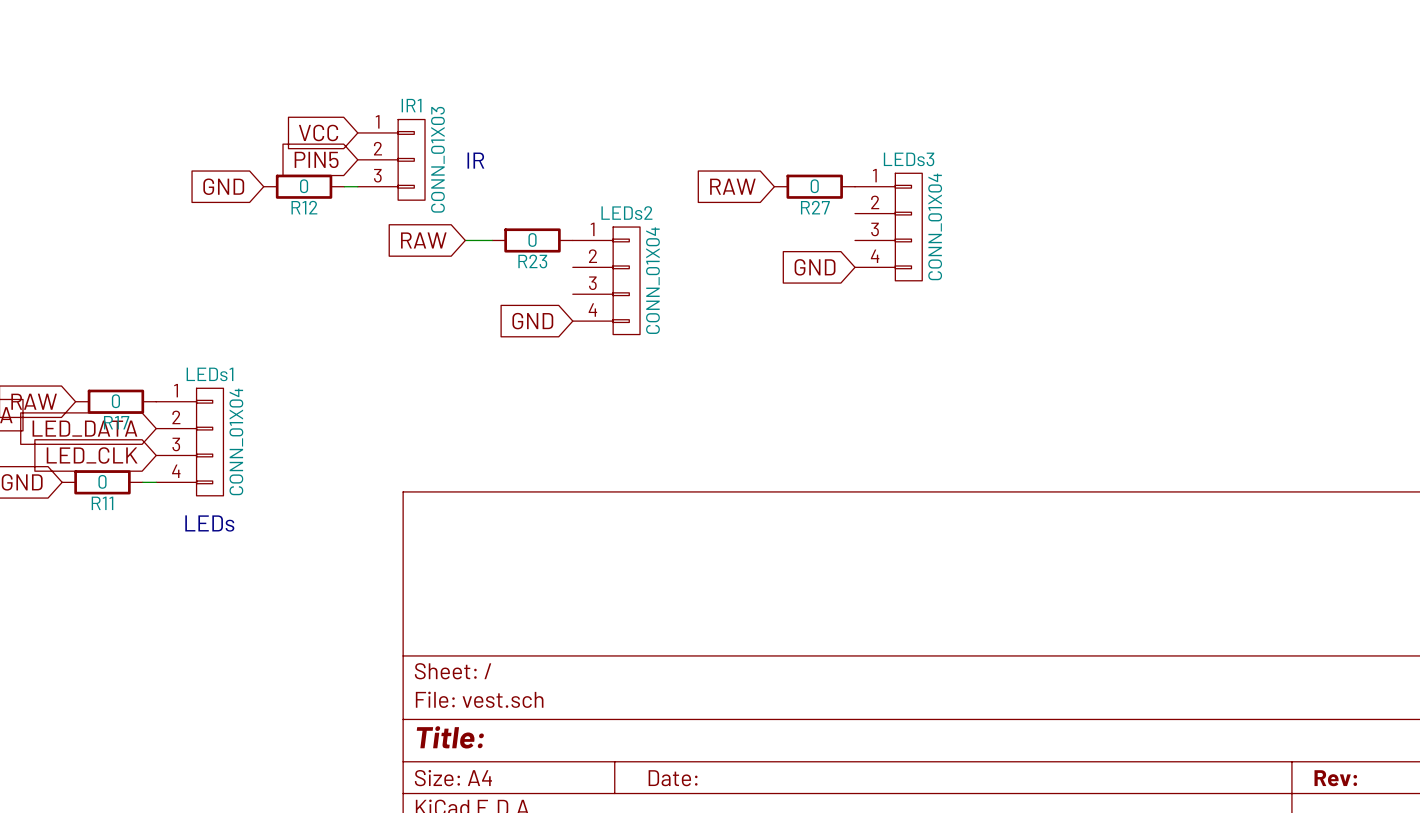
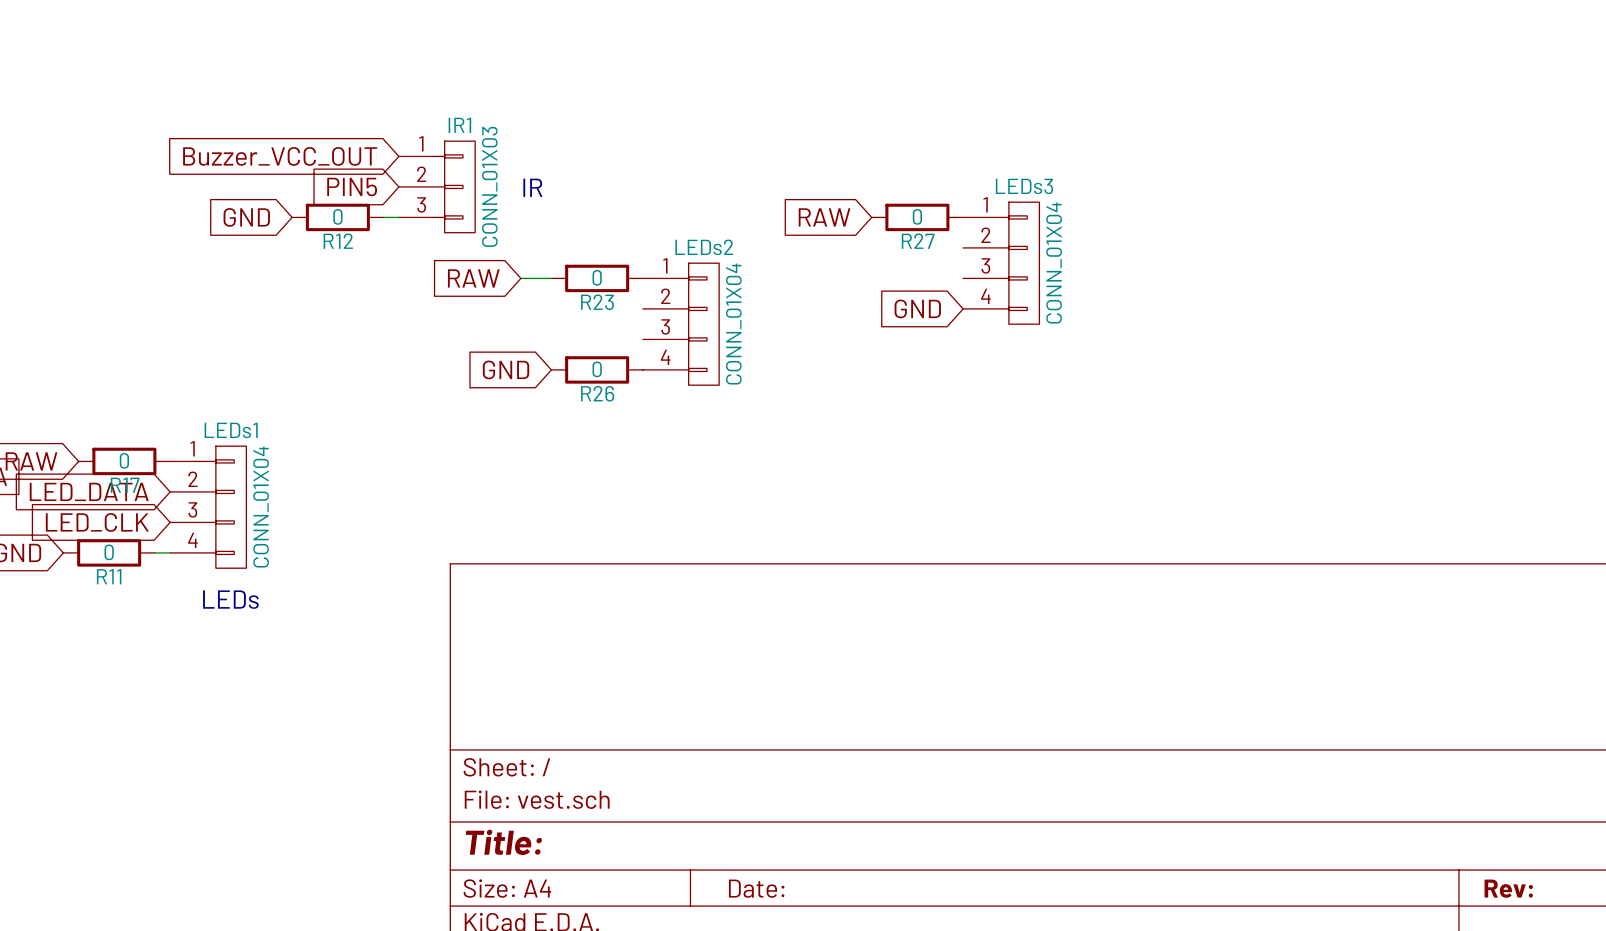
global label: VCC (318, 132) -> Buzzer_VCC_OUT (280, 156)
global label position: GND (532, 321) -> GND (506, 369)
R26: none -> 0 (597, 369)

